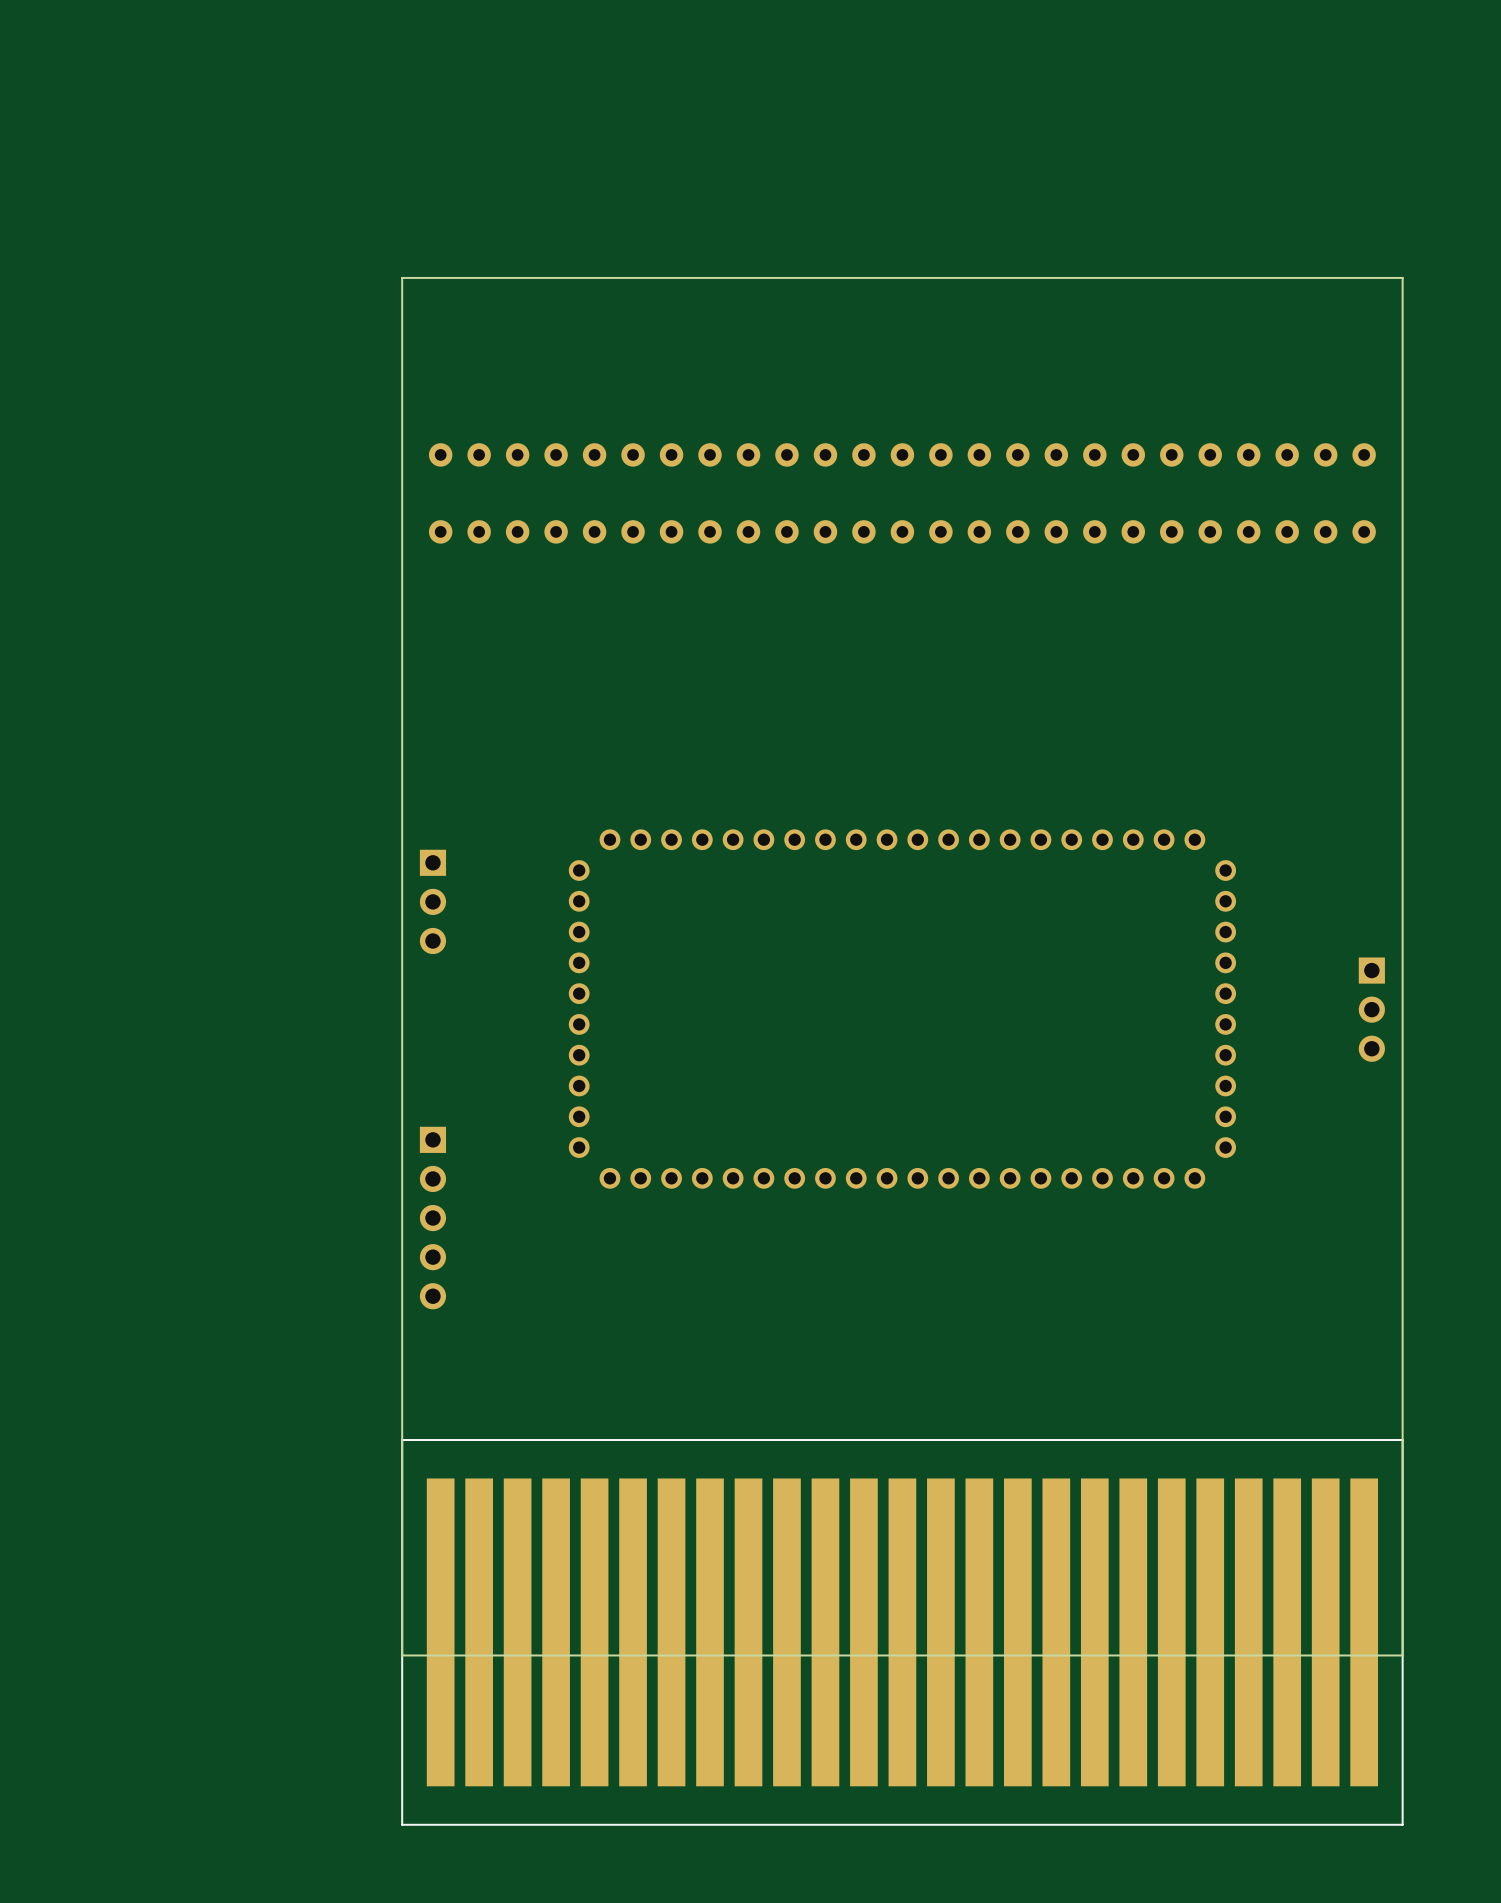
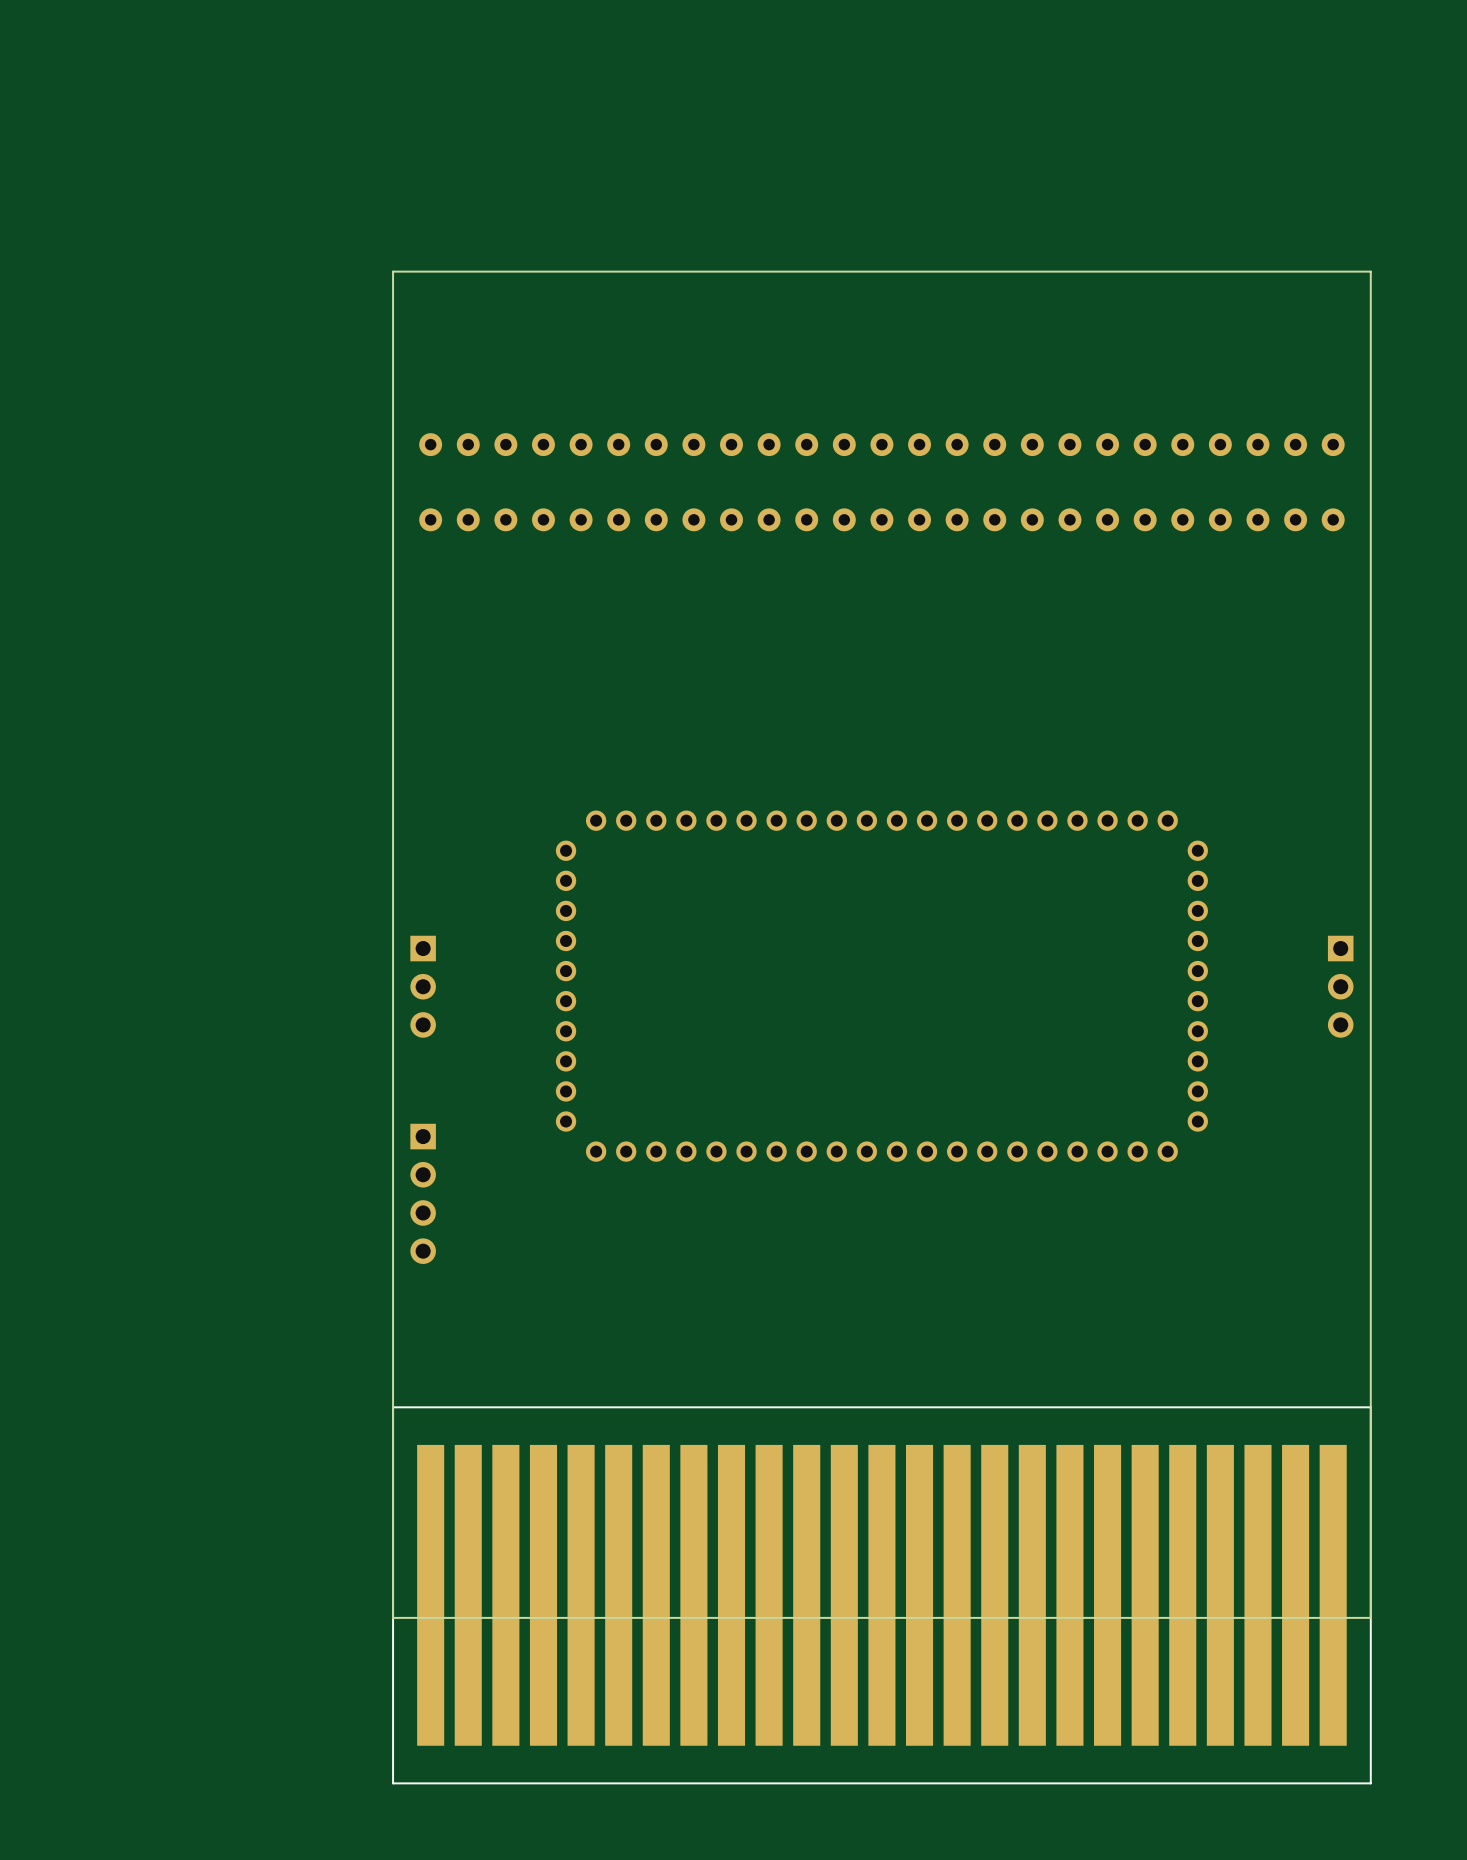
part position: (432, 901) -> (423, 986)
part footprint: [419, 1126, 447, 1310] -> [410, 1123, 436, 1264]

